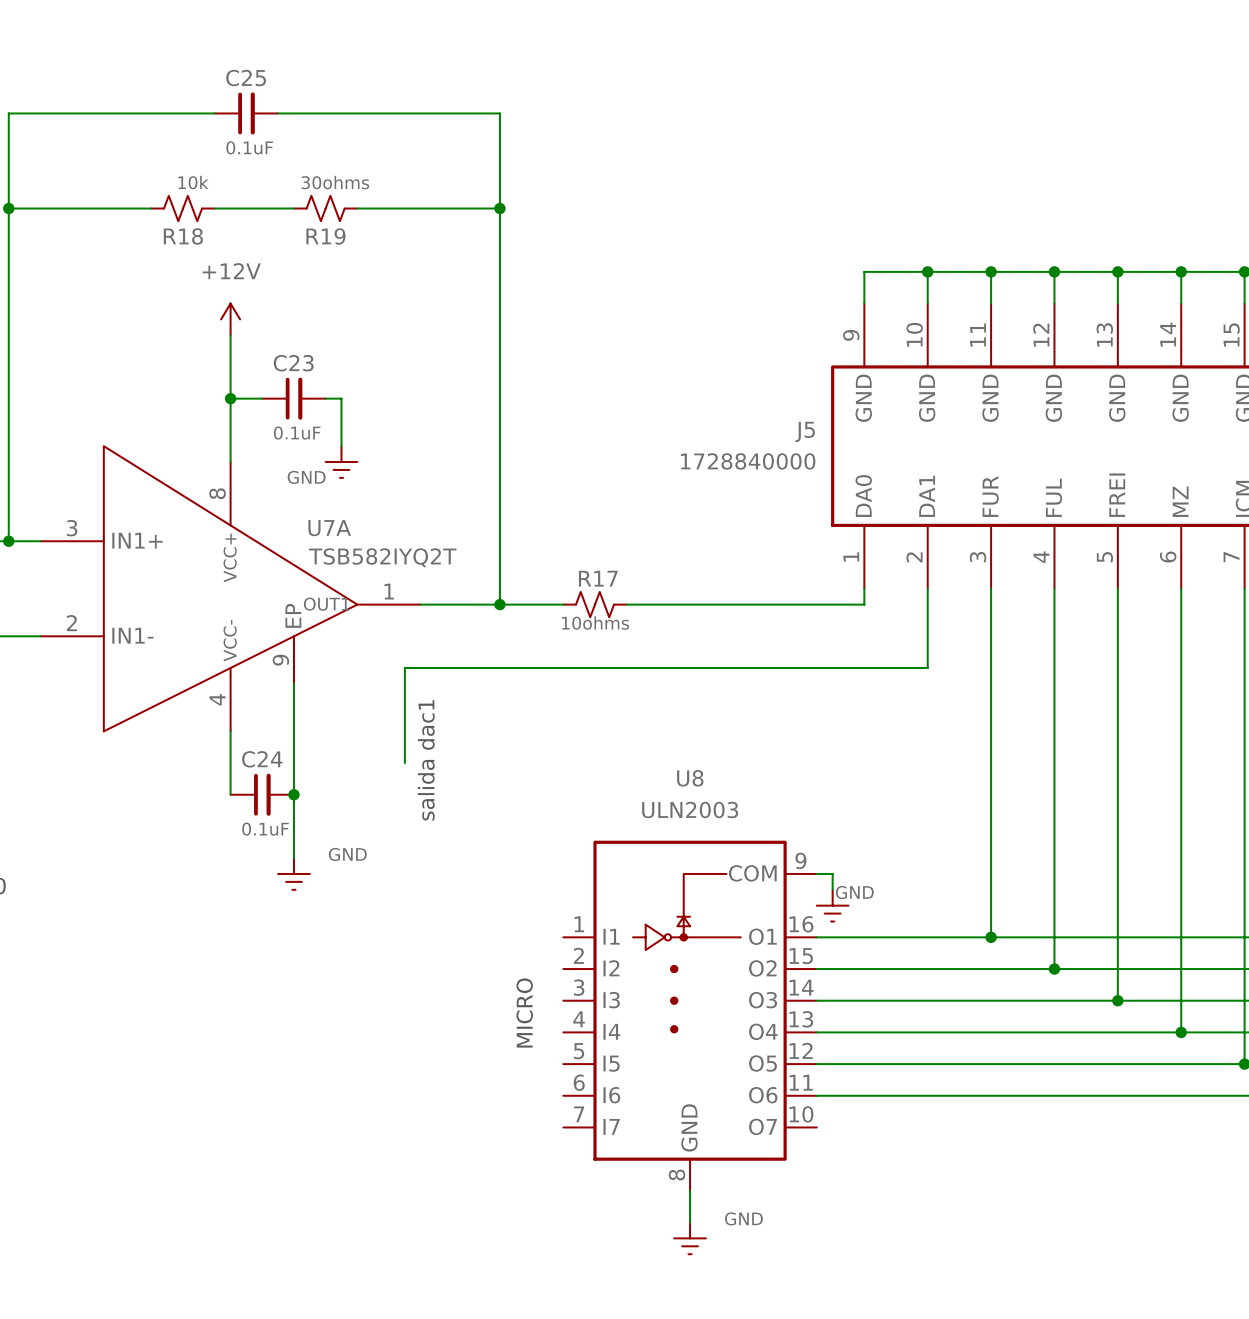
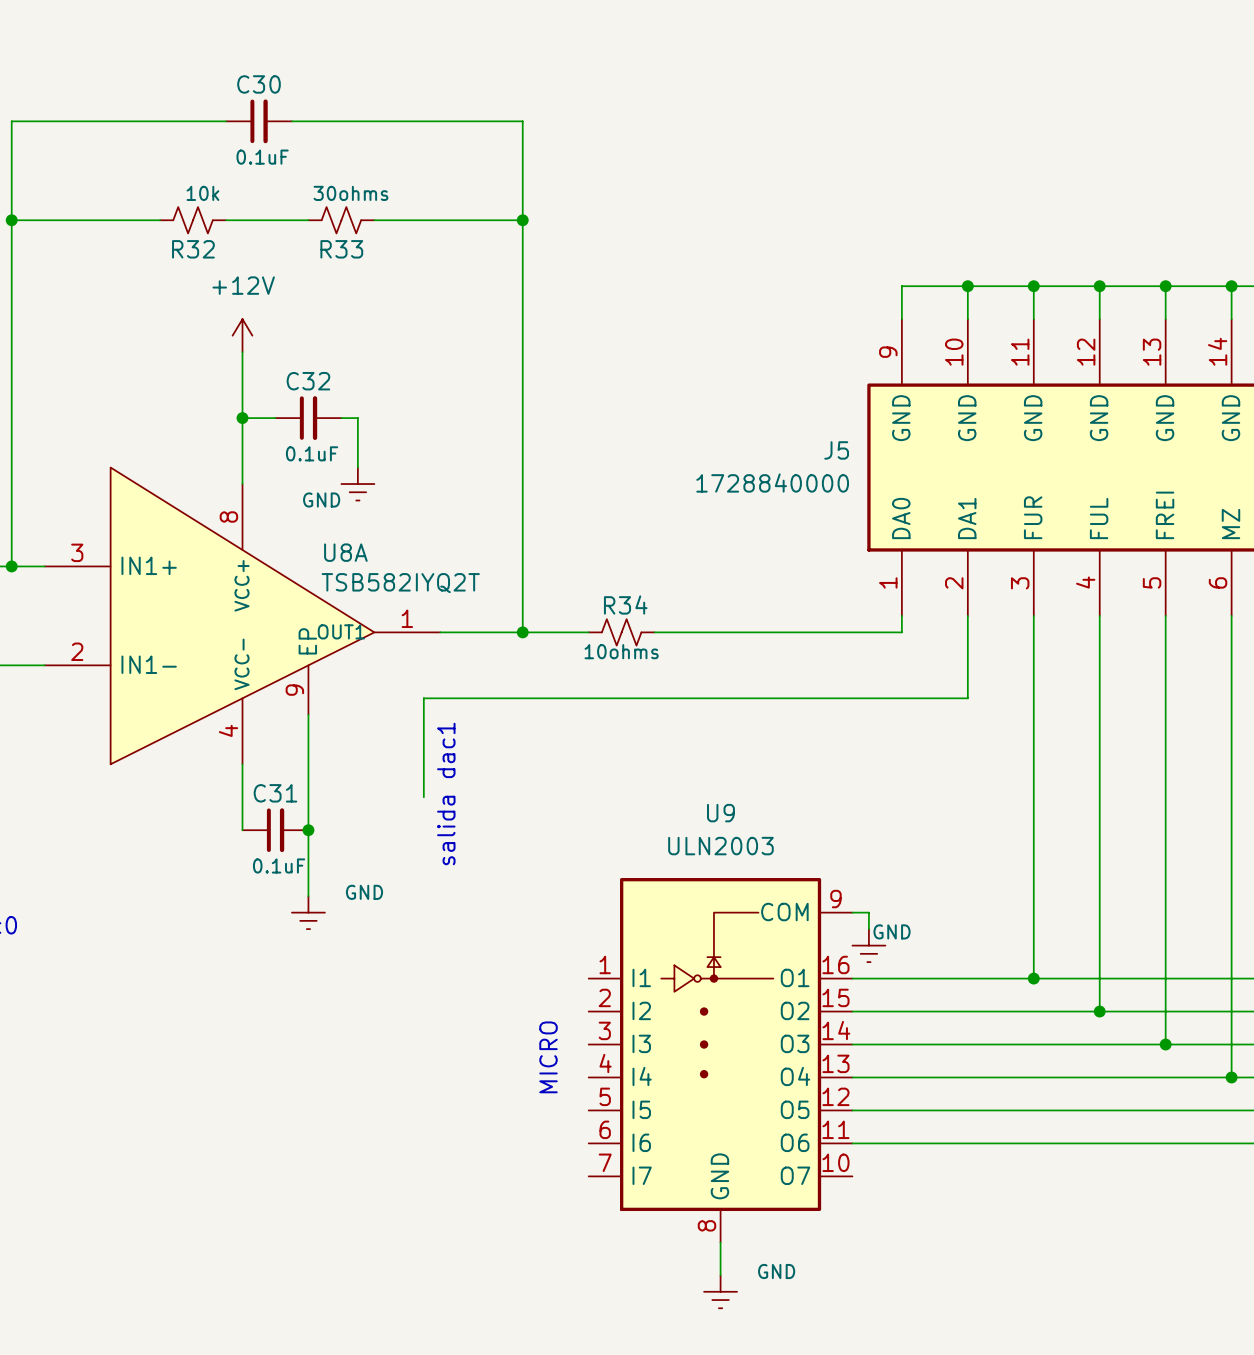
C25 name: C25 (246, 78) -> C30 (258, 84)
R18 name: R18 (183, 236) -> R32 (193, 249)
R19 name: R19 (325, 236) -> R33 (341, 249)
C23 name: C23 (293, 363) -> C32 (308, 381)
U7A name: U7A (329, 528) -> U8A (345, 552)
R17 name: R17 (598, 578) -> R34 (625, 605)
C24 name: C24 (262, 759) -> C31 (275, 793)
U8 name: U8 (690, 778) -> U9 (720, 813)

